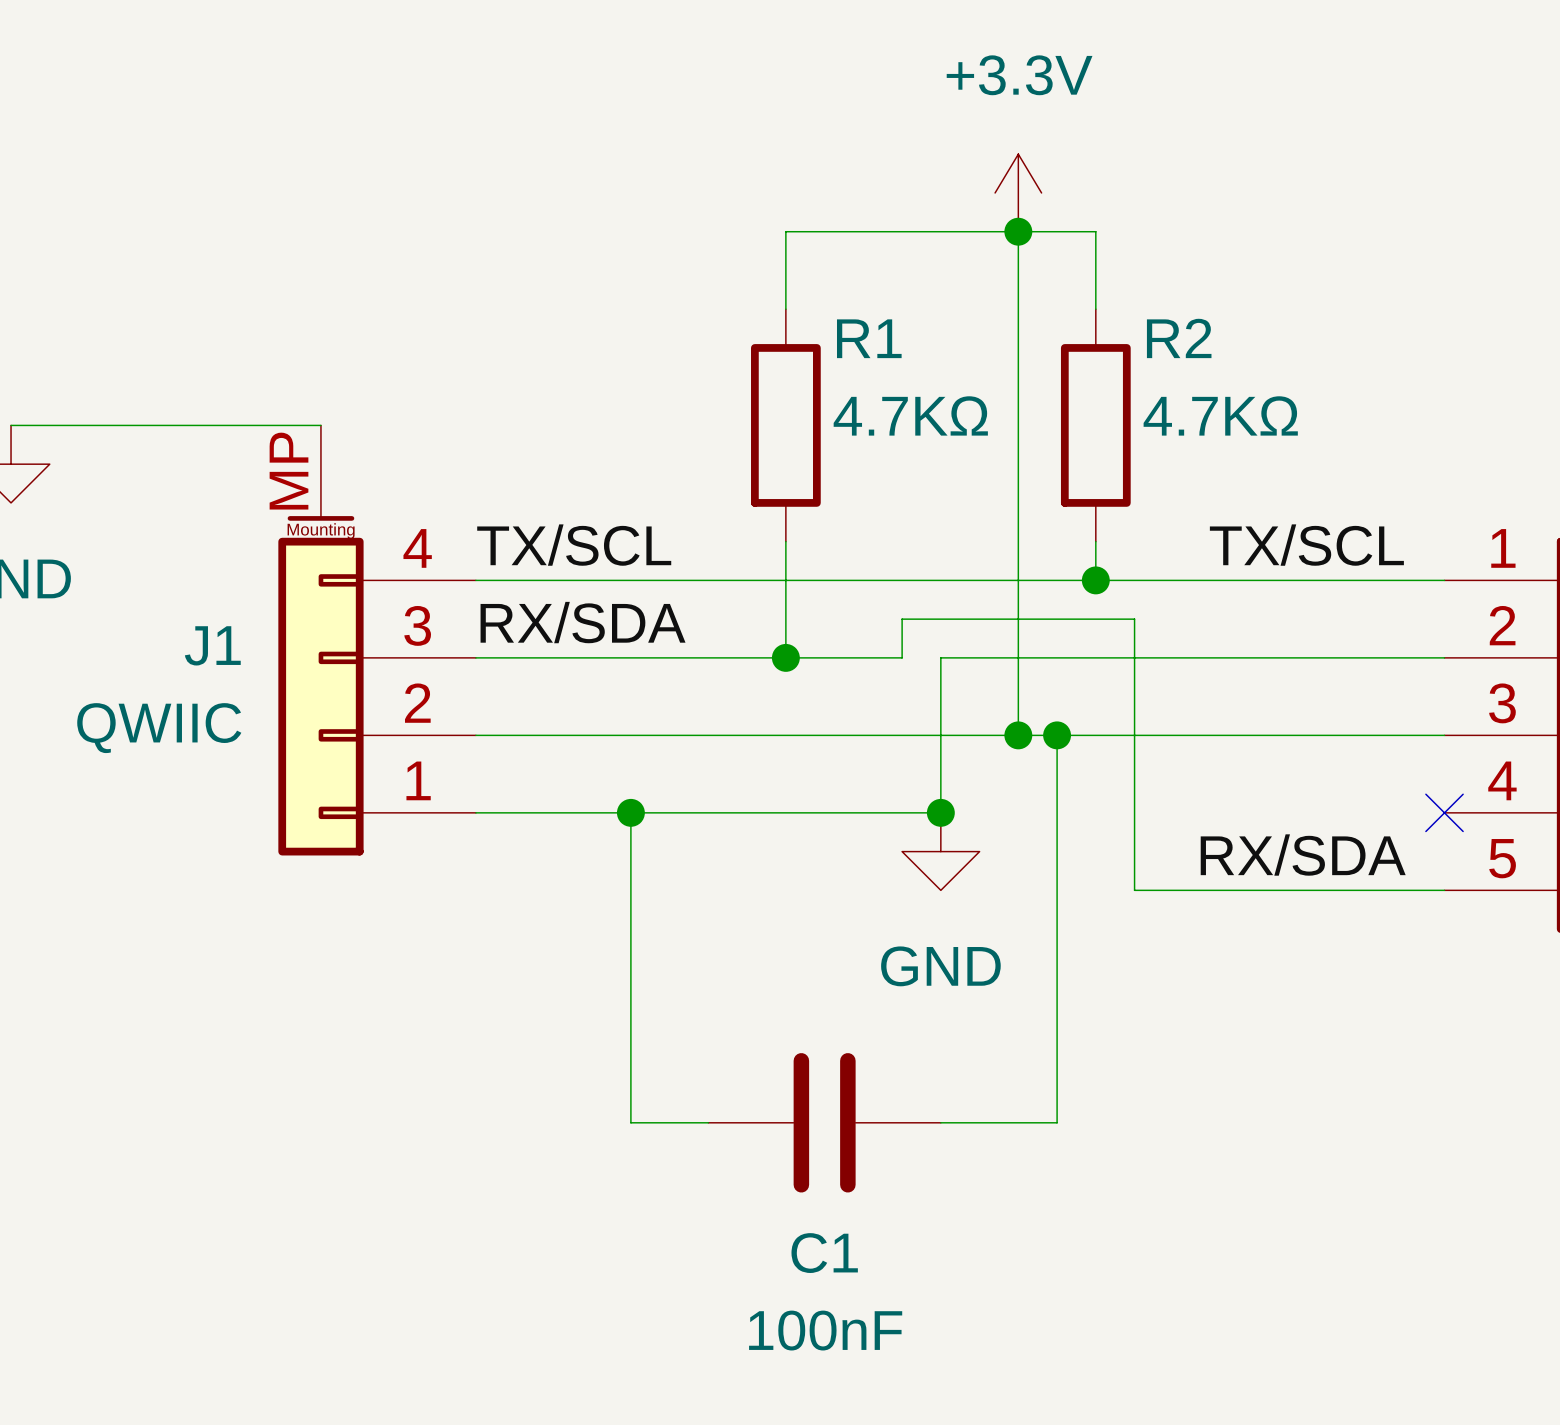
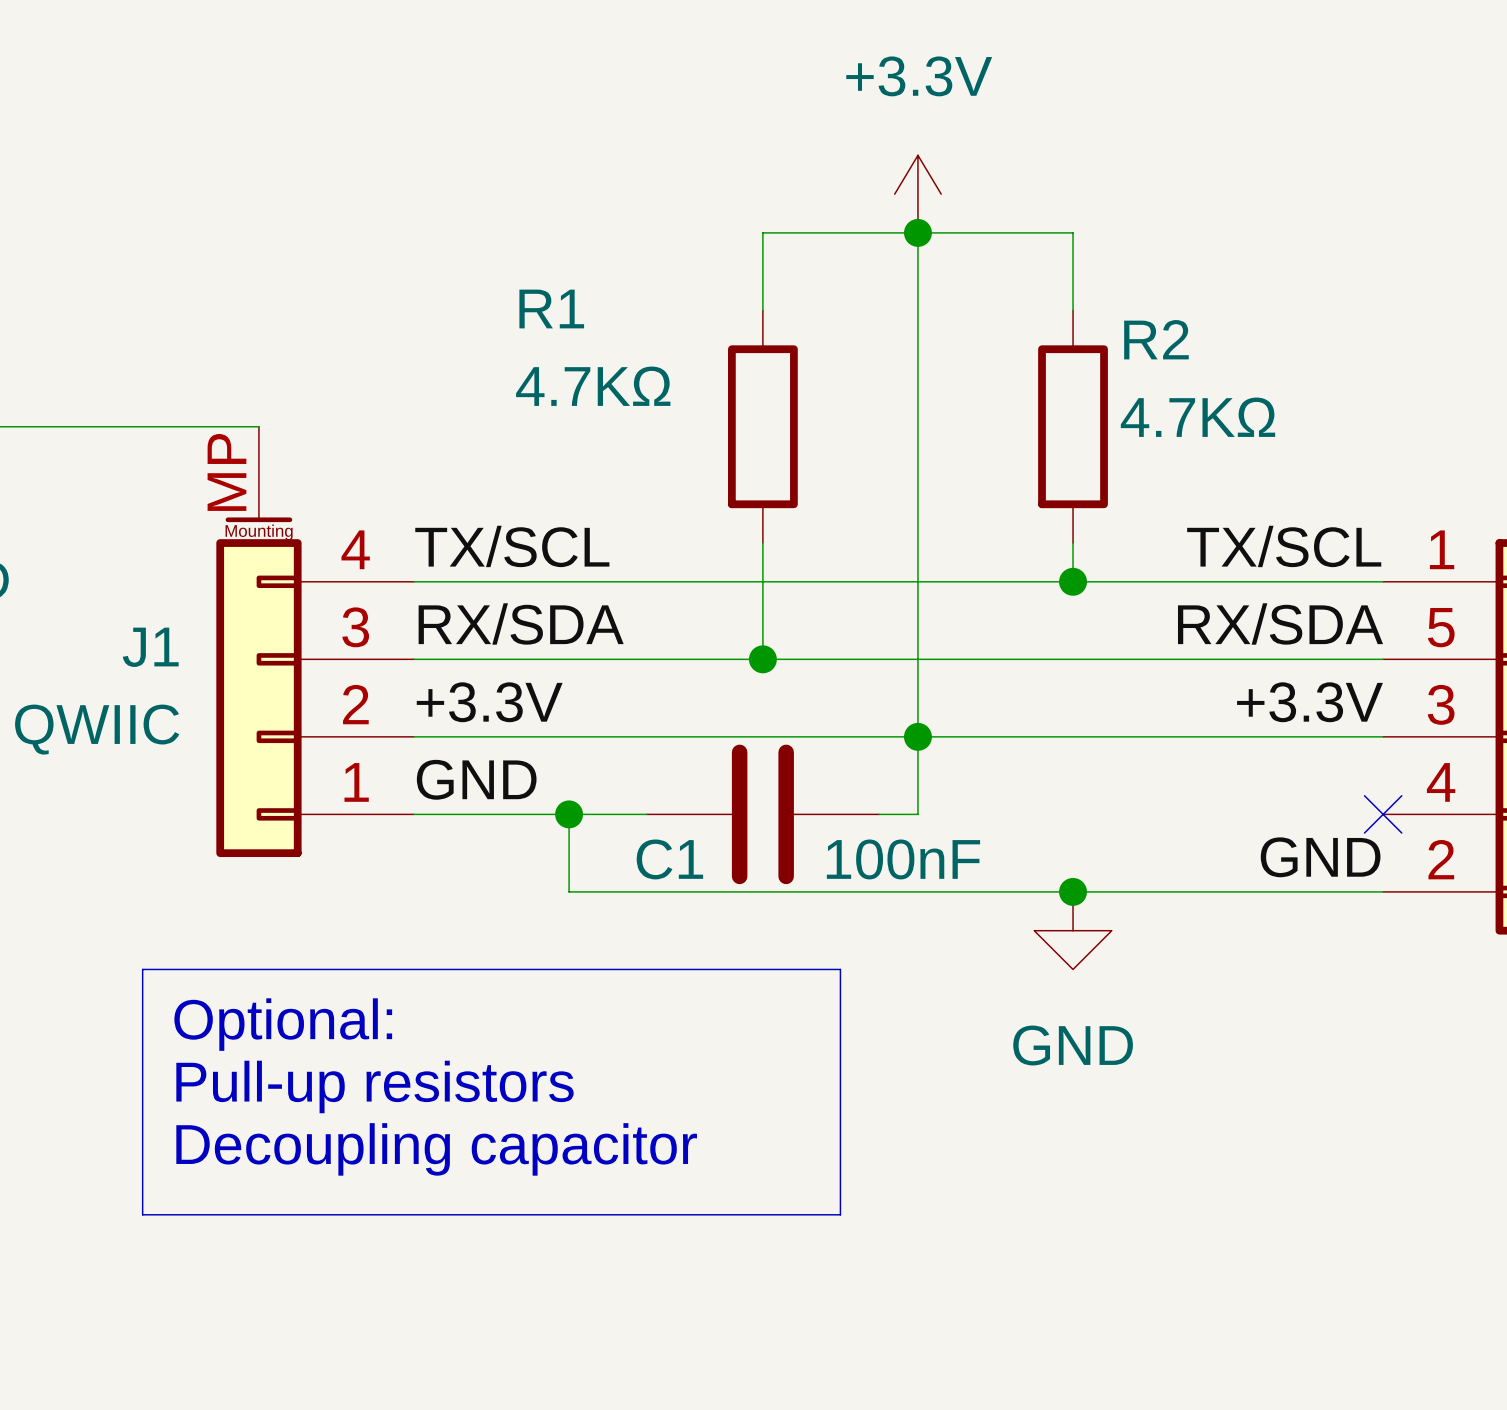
power symbol position: +3.3V (1018, 192) -> +3.3V (917, 194)
wire: (824, 231) (785, 231) (785, 309) -> (762, 232) (762, 310)
wire: none -> (917, 232) (917, 814) (879, 814)
wire: (1018, 231) (1018, 735) -> none
junction position: (1018, 231) -> (917, 232)
wire: (1095, 231) (1095, 309) -> (1034, 232) (1073, 232) (1073, 310)
R1 name position: R1 (869, 338) -> R1 (551, 308)
R1 value position: 4.7KΩ (910, 415) -> 4.7KΩ (593, 386)
R1 position: (785, 425) -> (762, 426)
R2 position: (1095, 425) -> (1073, 426)
wire: (785, 541) (785, 657) -> (762, 543) (762, 659)
wire: (1095, 541) (1095, 580) -> (1073, 543) (1073, 581)
label position: TX/SCL (1306, 545) -> TX/SCL (1284, 546)
junction position: (1095, 580) -> (1073, 581)
part pin number: 2 (1502, 625) -> 5 (1441, 627)
junction position: (785, 657) -> (762, 659)
wire: (902, 657) (902, 619) (1134, 619) (1134, 890) -> (569, 891) (1073, 891)
wire: (940, 657) (940, 812) (708, 812) -> (879, 659) (840, 659)
label: none -> +3.3V (489, 702)
label: none -> +3.3V (1309, 702)
junction: none -> (917, 736)
junction: (1018, 735) -> none
wire: (1057, 735) (1057, 1122) (940, 1122) -> none
junction: (1057, 735) -> none
label: none -> GND (476, 779)
junction: (940, 812) -> none
power symbol position: GND (940, 851) -> GND (1073, 930)
label position: RX/SDA (1303, 855) -> RX/SDA (1280, 623)
label: none -> GND (1320, 857)
part pin number: 5 (1502, 858) -> 2 (1441, 859)
wire: (630, 890) (630, 1122) (708, 1122) -> none
junction: none -> (1073, 891)
line: none -> (142, 969) (840, 969) (840, 1214) (142, 1214) (142, 969)
text: none -> Optional: (283, 1024)
text: none -> Pull-up resistors (374, 1086)
C1 position: (824, 1122) -> (762, 814)
text: none -> Decoupling capacitor (436, 1149)
C1 name position: C1 (824, 1253) -> C1 (669, 859)
C1 value position: 100nF (825, 1330) -> 100nF (903, 859)

